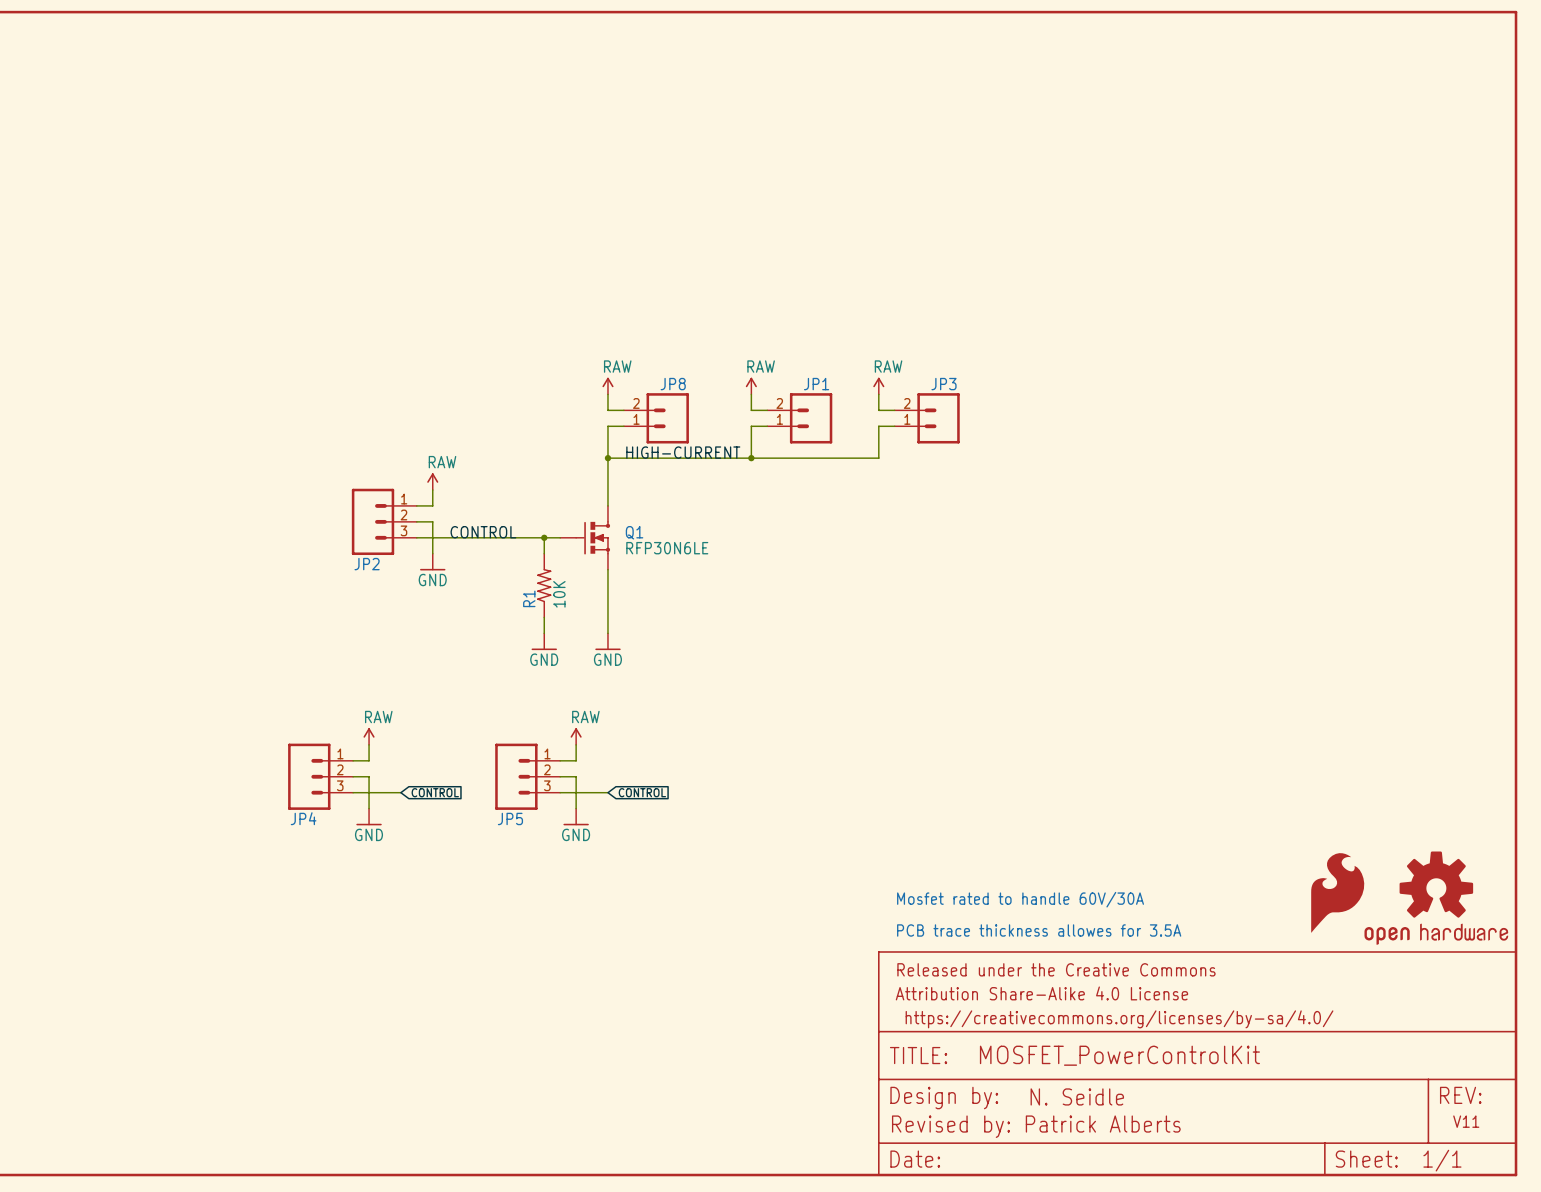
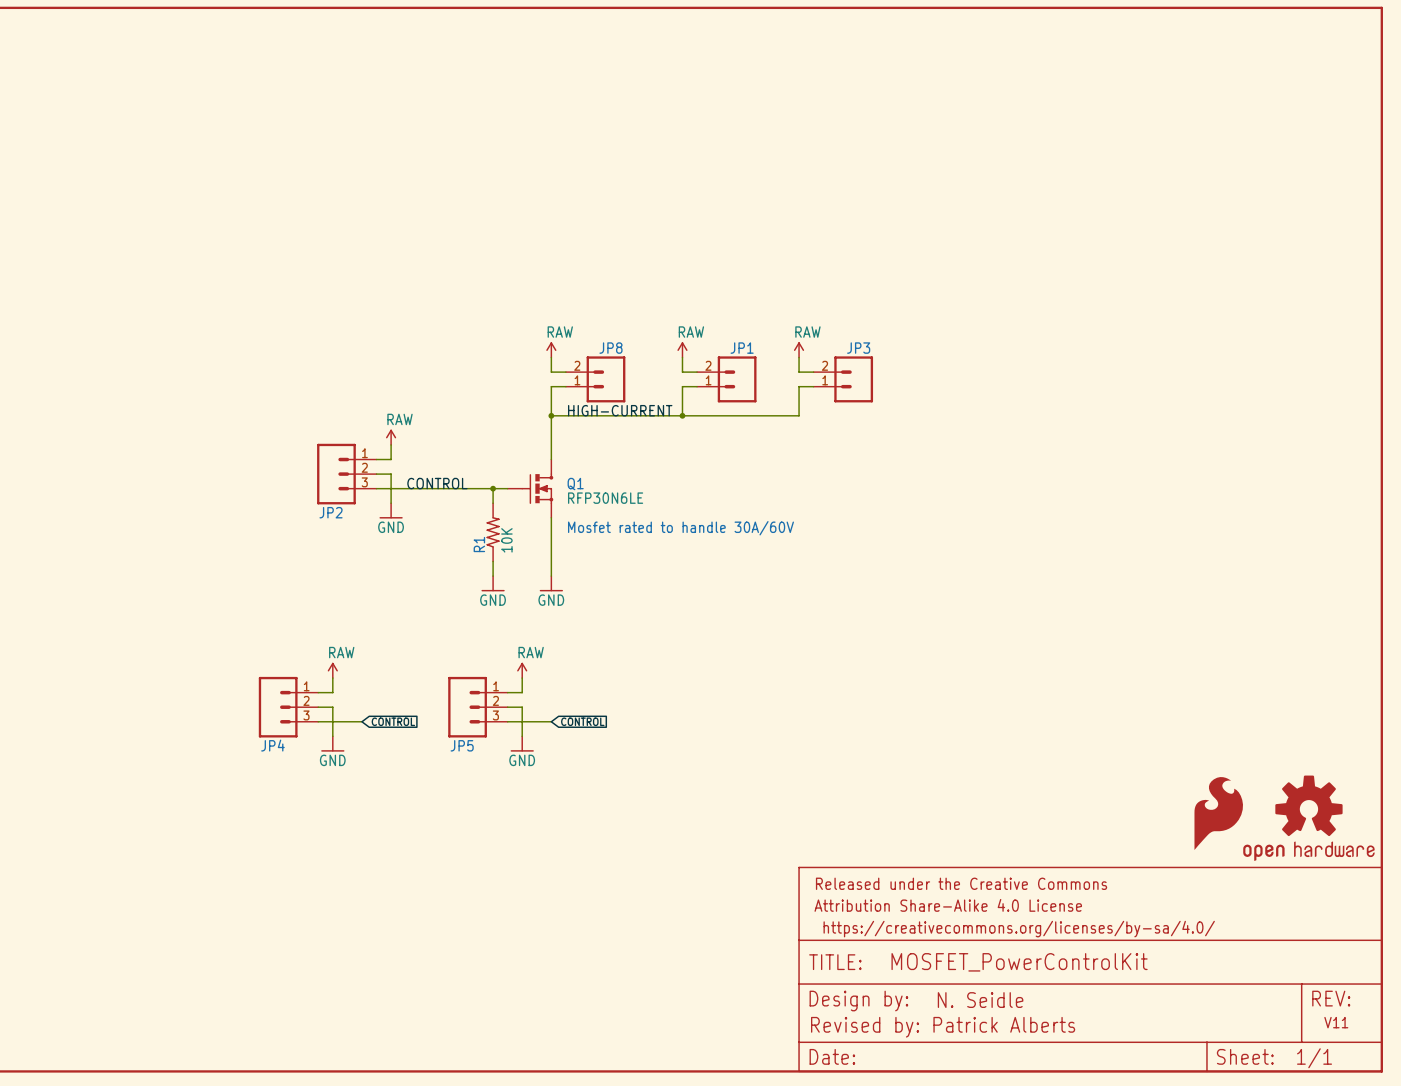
text: none -> Mosfet rated to handle 30A/60V (680, 528)
text: Mosfet rated to handle 60V/30A (1020, 899) -> none
text: PCB trace thickness allowes for 3.5A (1039, 930) -> none

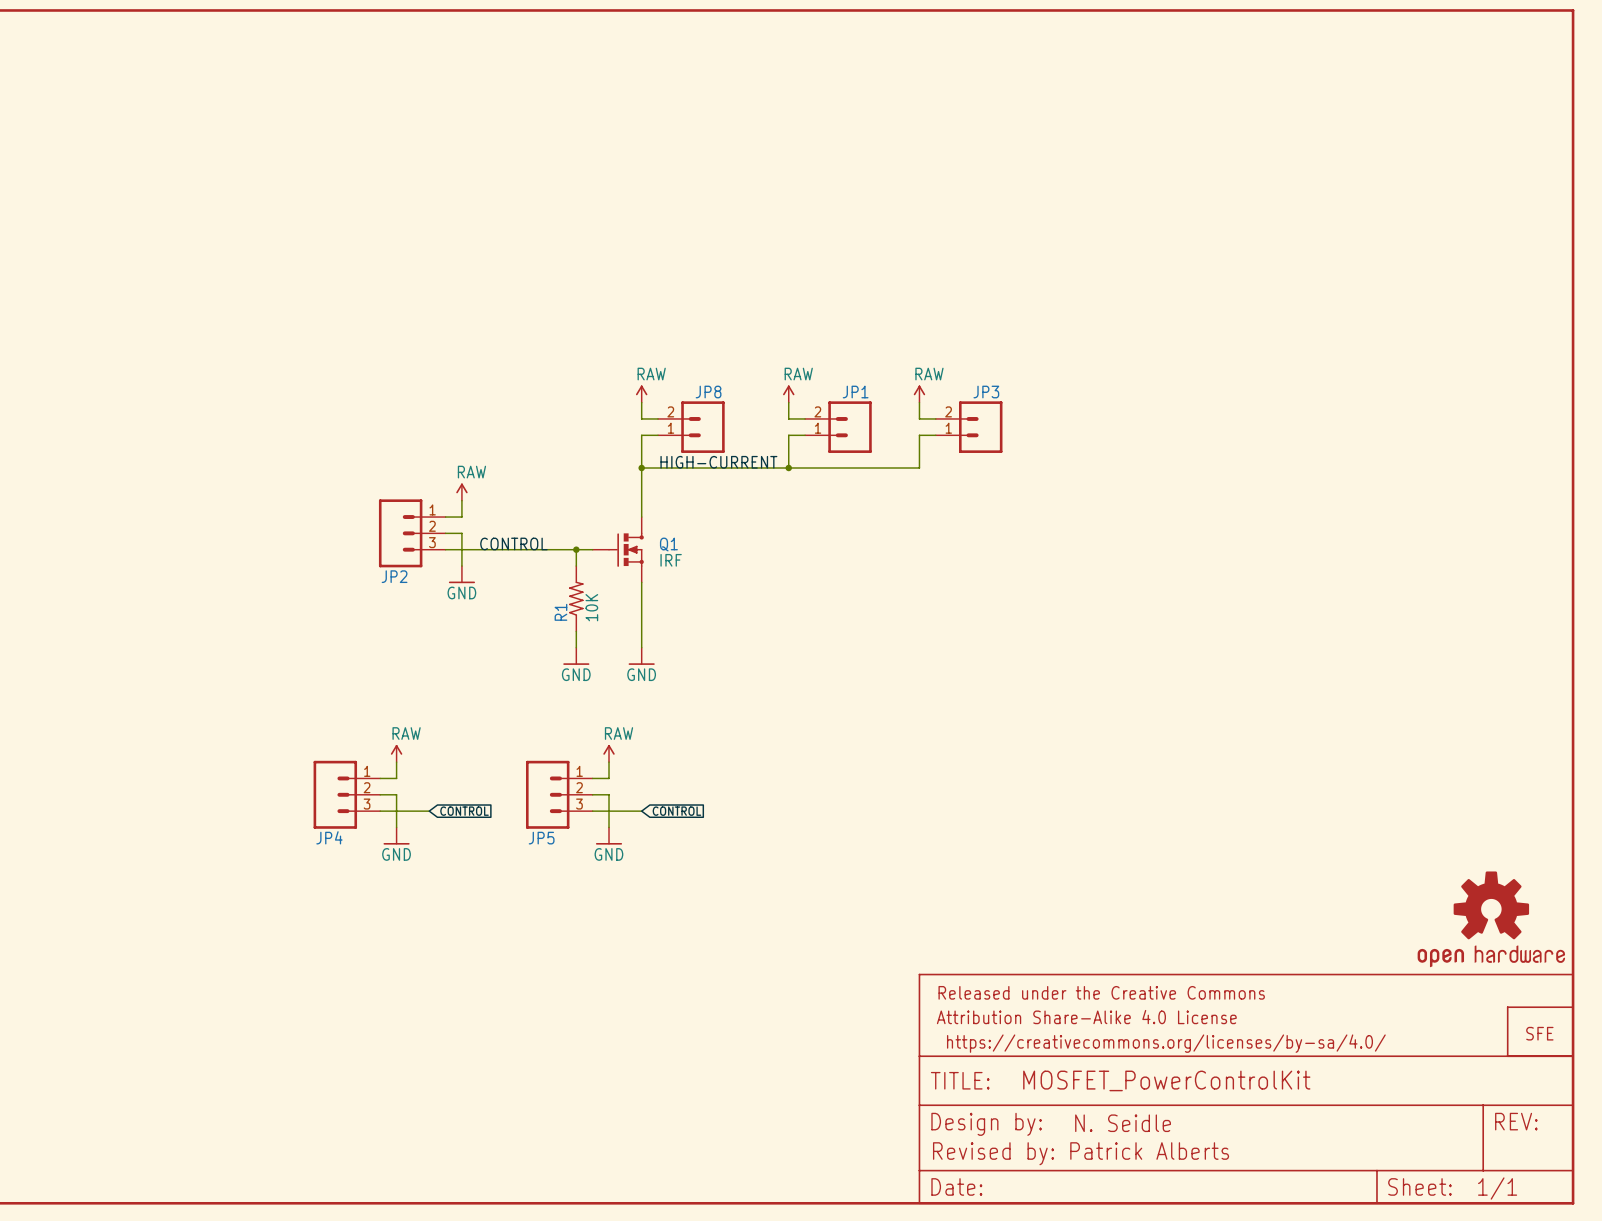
Q1 value: RFP30N6LE (605, 498) -> IRF (671, 560)
text: Mosfet rated to handle 30A/60V (680, 528) -> none
part: (1218, 813) -> none
part: none -> (1540, 1031)
text: V11 (1336, 1022) -> none

